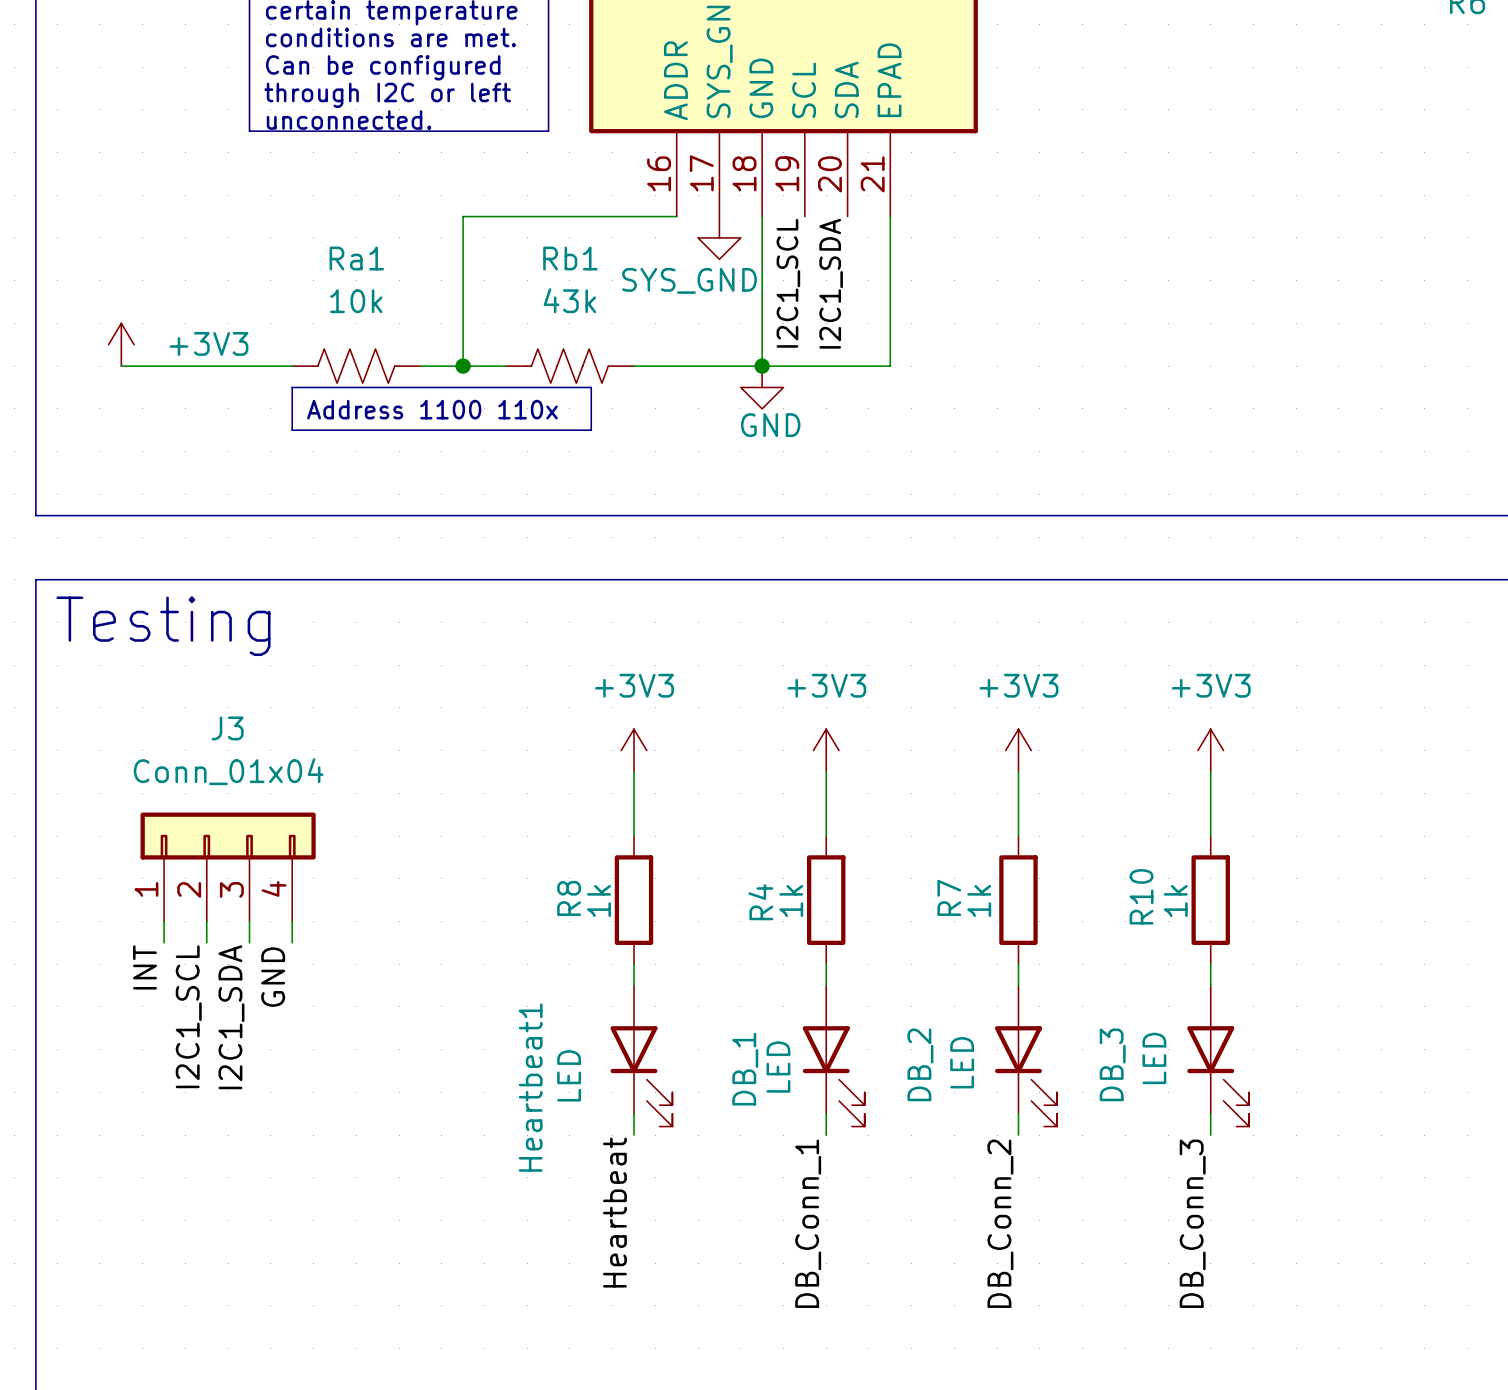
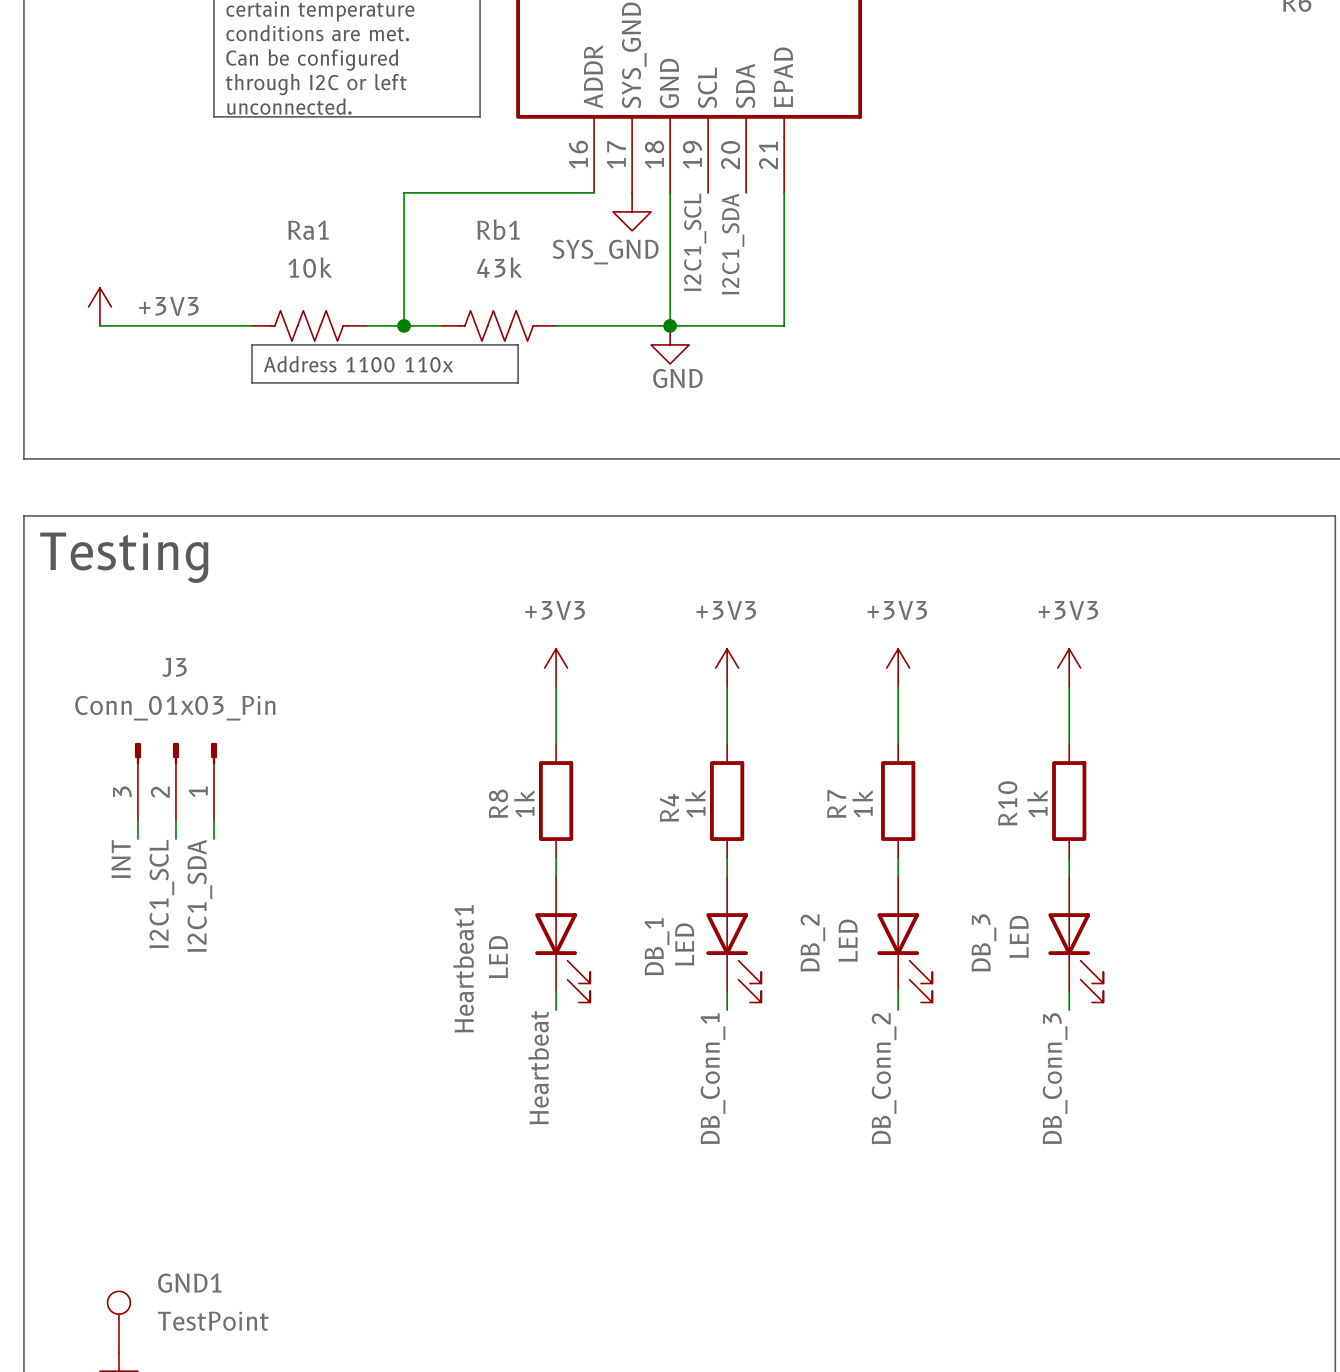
J3 value: Conn_01x04 (228, 771) -> Conn_01x03_Pin (175, 708)
J3 symbol: [140, 812, 316, 922] -> [134, 742, 218, 821]
wire: (292, 921) (292, 942) -> none
label: GND (273, 977) -> none

